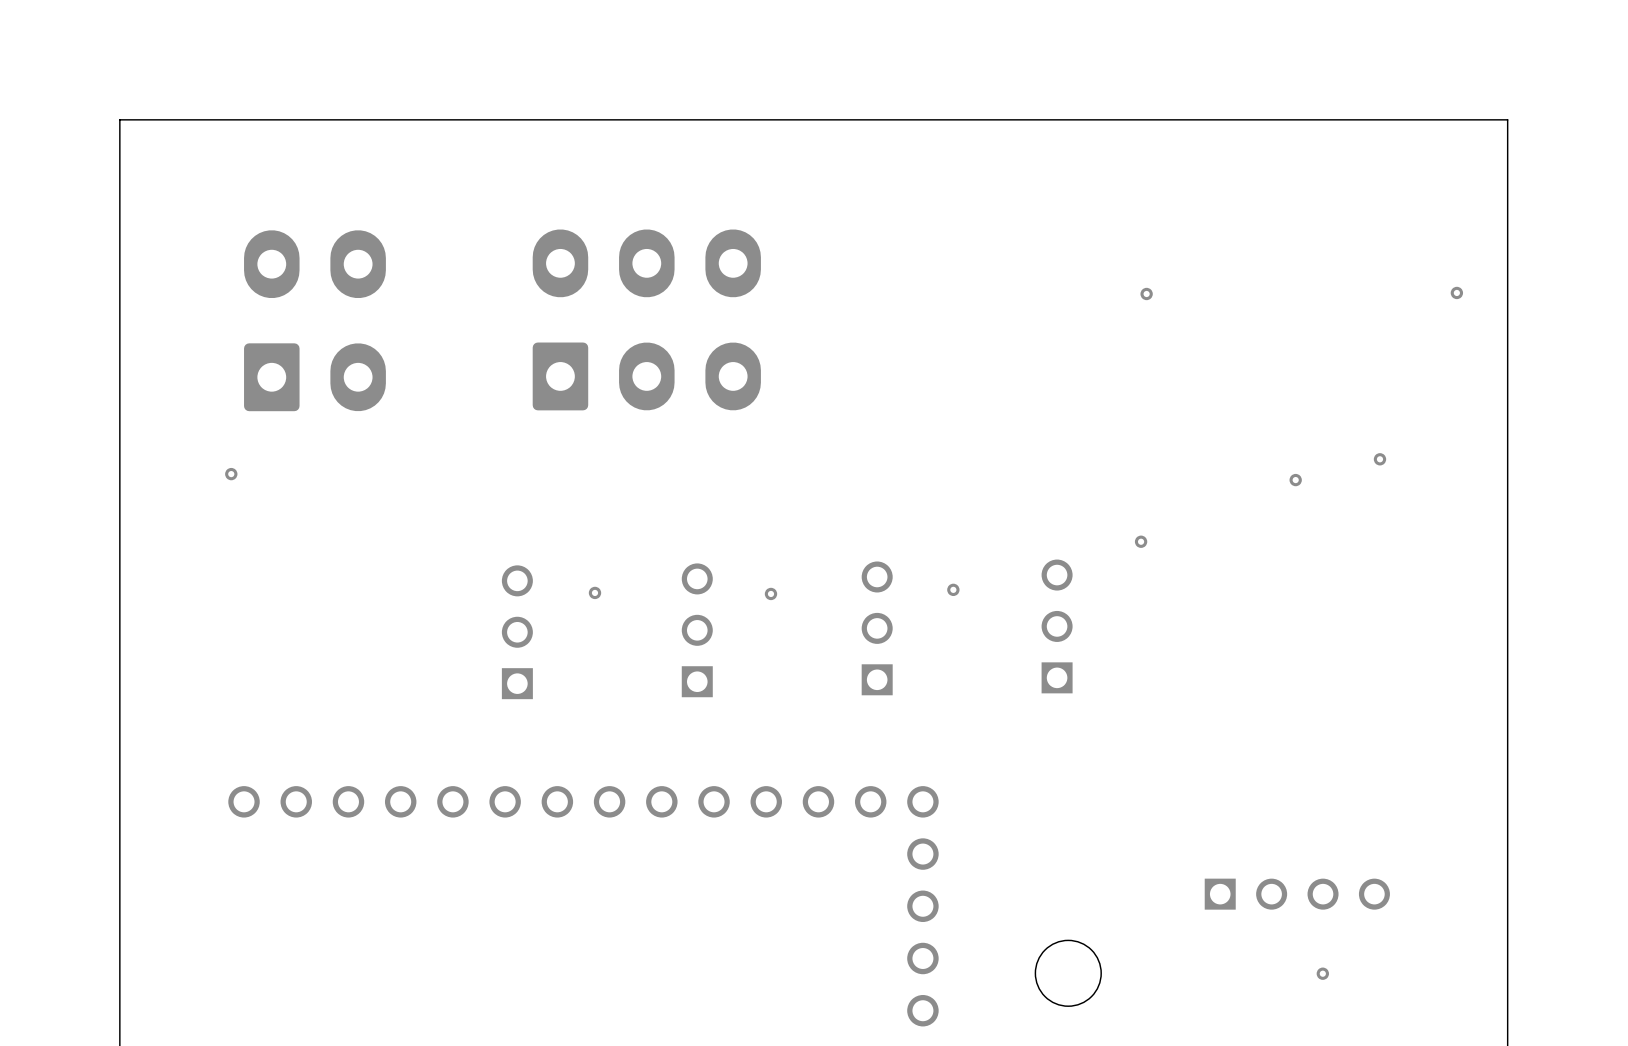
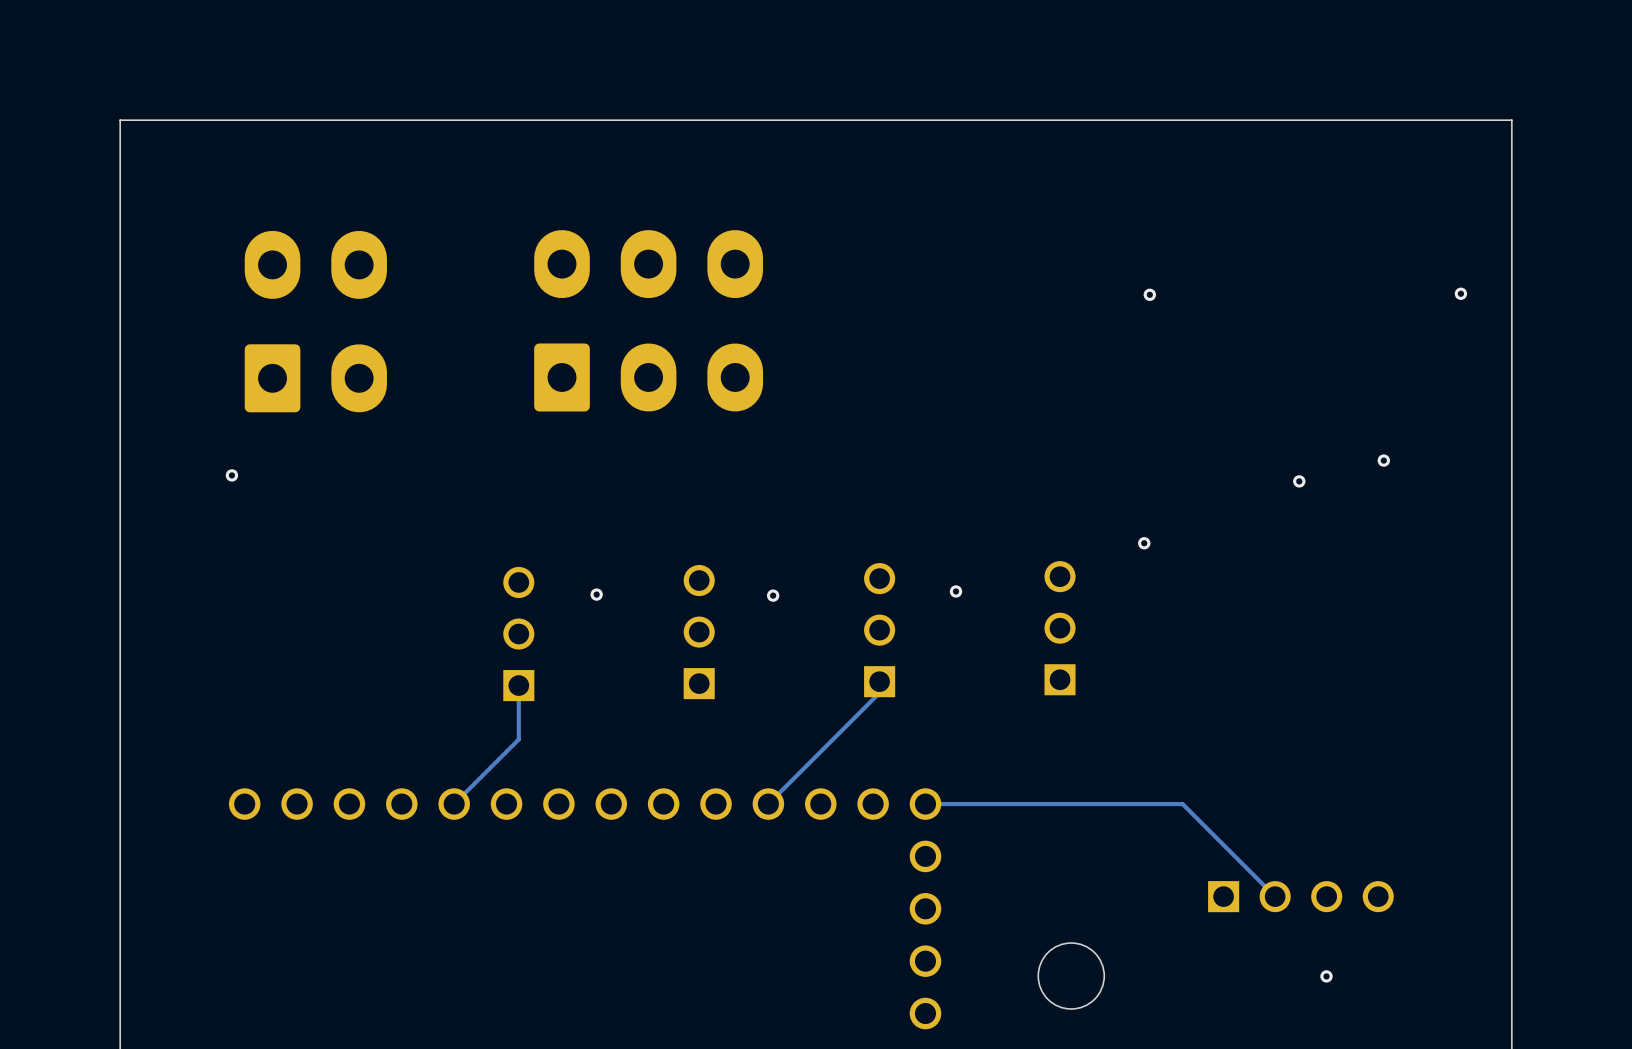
track: none -> (879, 681) (879, 692) (768, 804)
track: none -> (518, 685) (518, 739) (454, 804)
track: none -> (925, 804) (1182, 804) (1275, 896)

